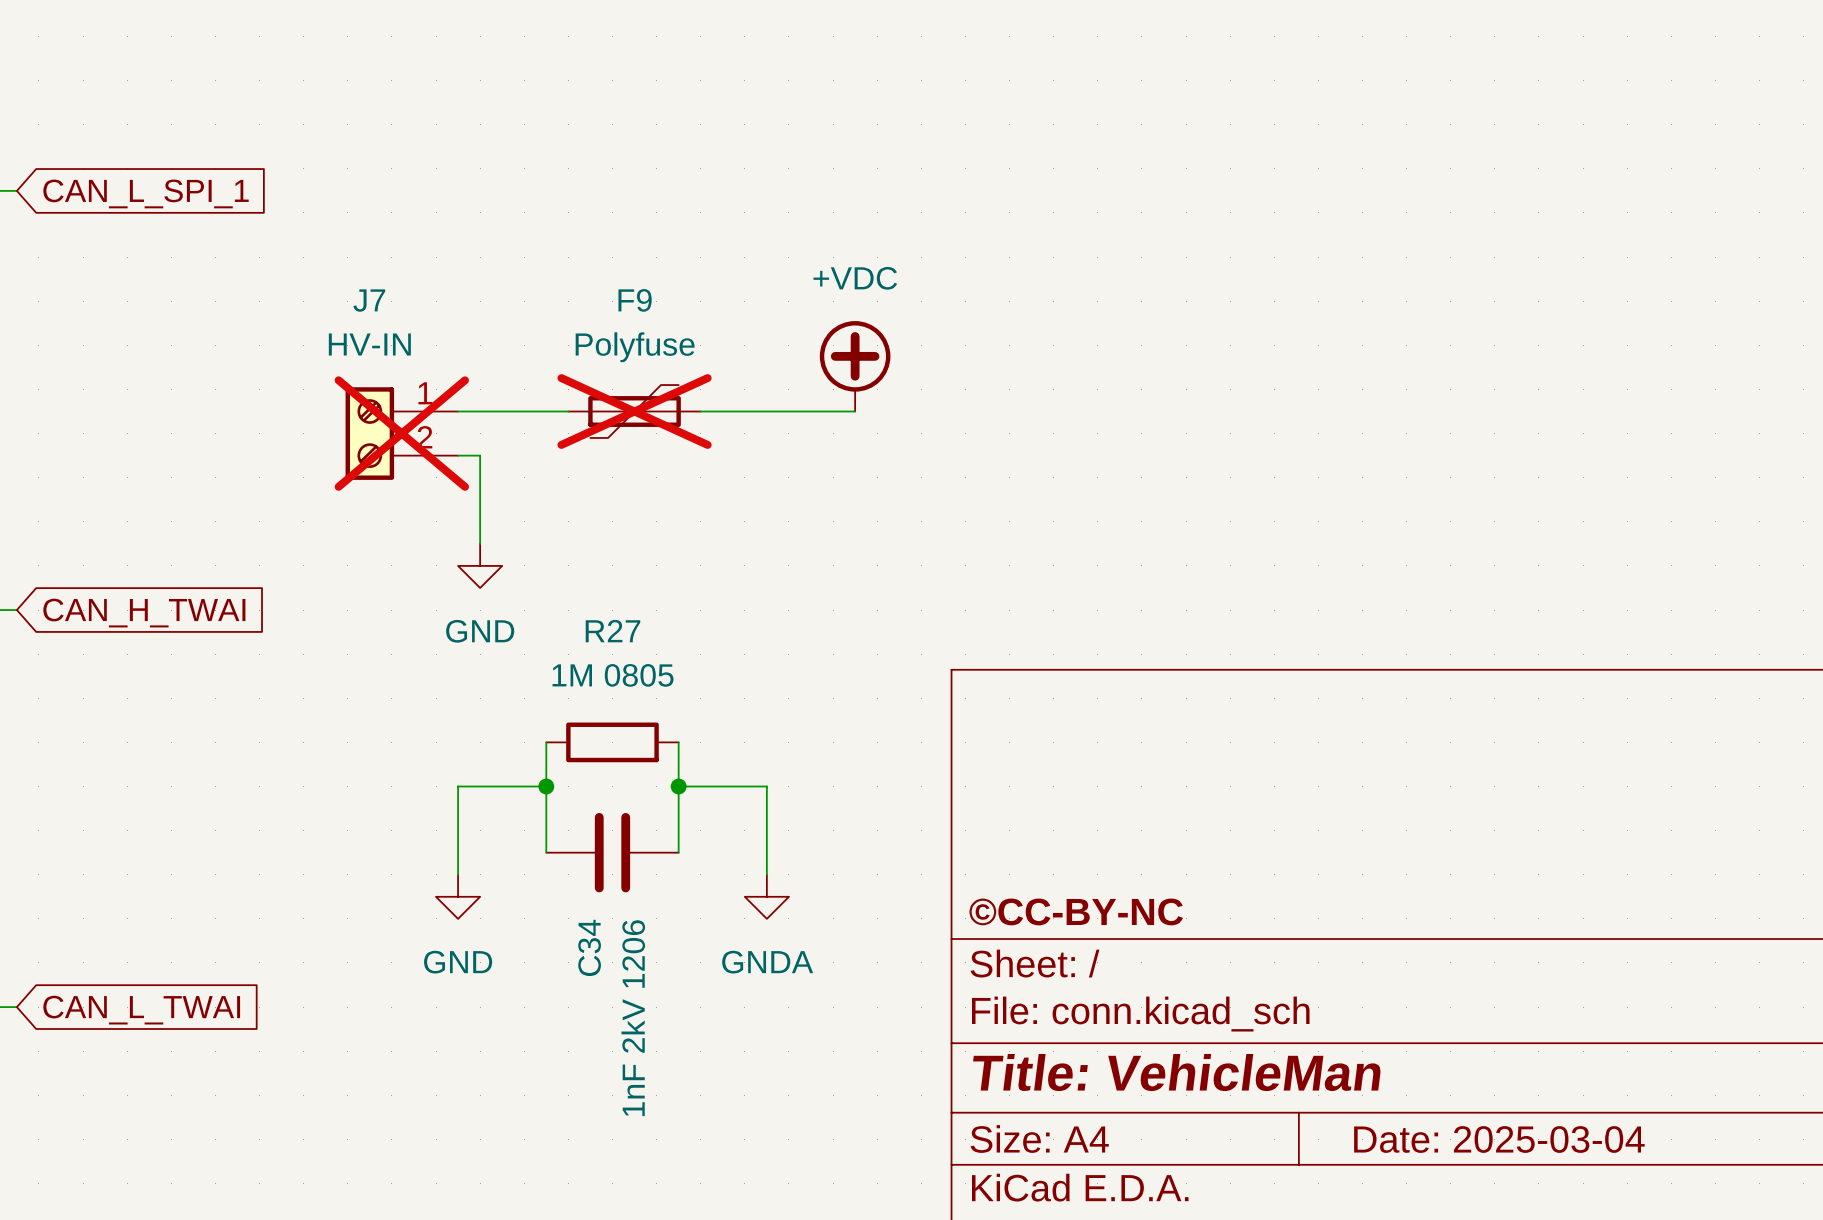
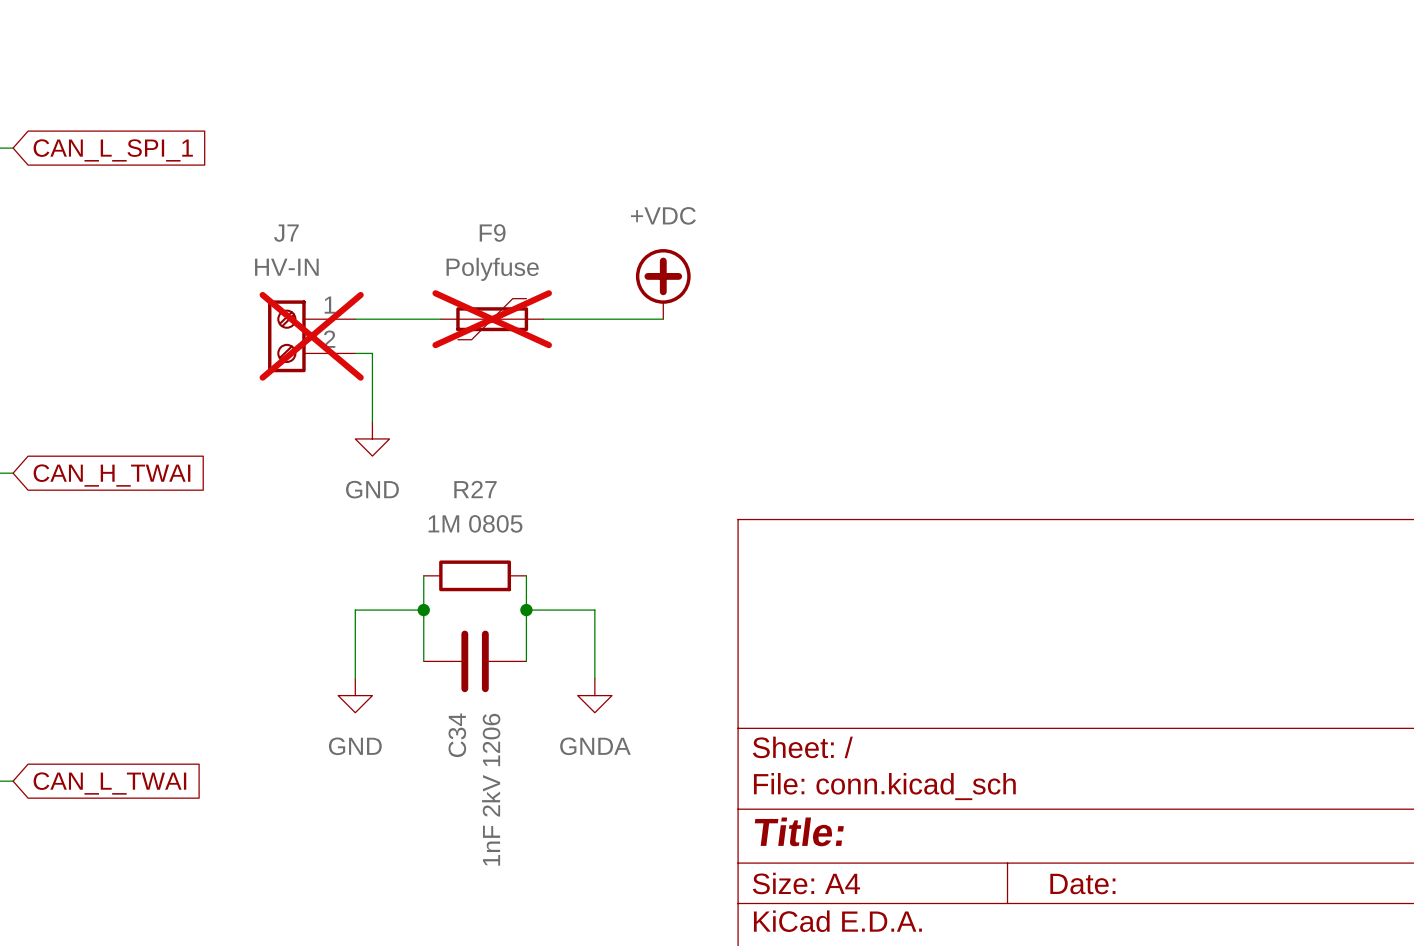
title block: ©CC-BY-NC (1076, 911) -> none
title block: Title: VehicleMan (1177, 1072) -> Title: (799, 831)
title block: Date: 2025-03-04 (1499, 1139) -> Date: (1082, 884)

